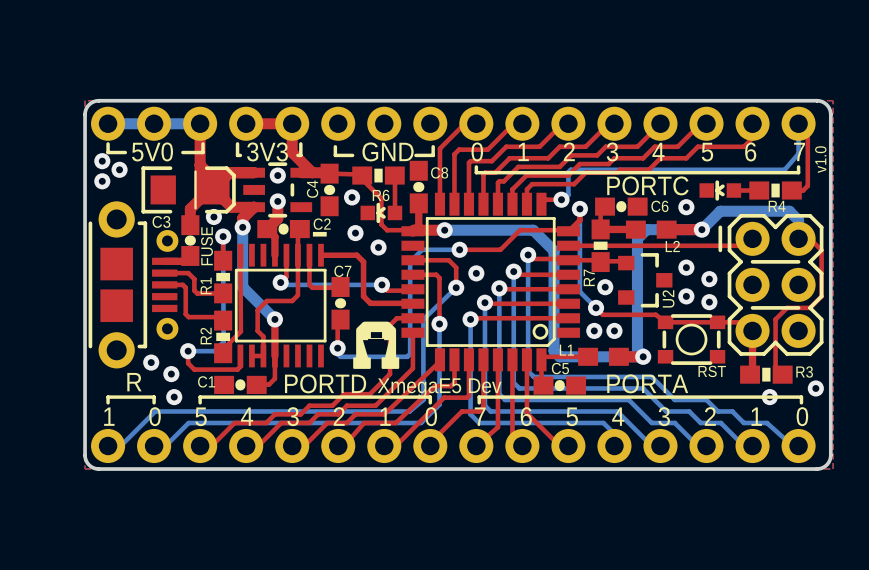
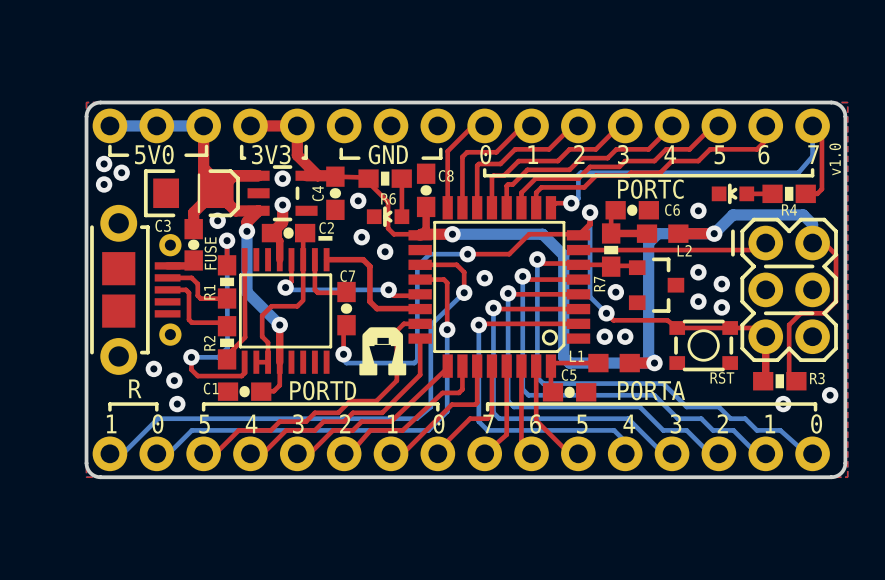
U2 name: U2 (668, 298) -> none
text: XmegaE5 Dev (439, 387) -> none

